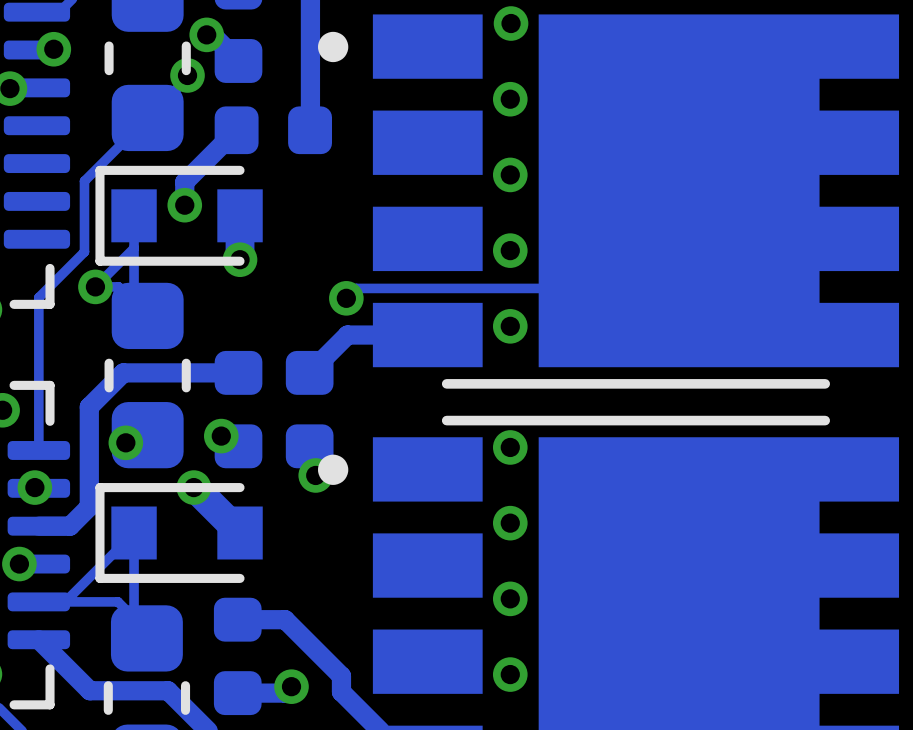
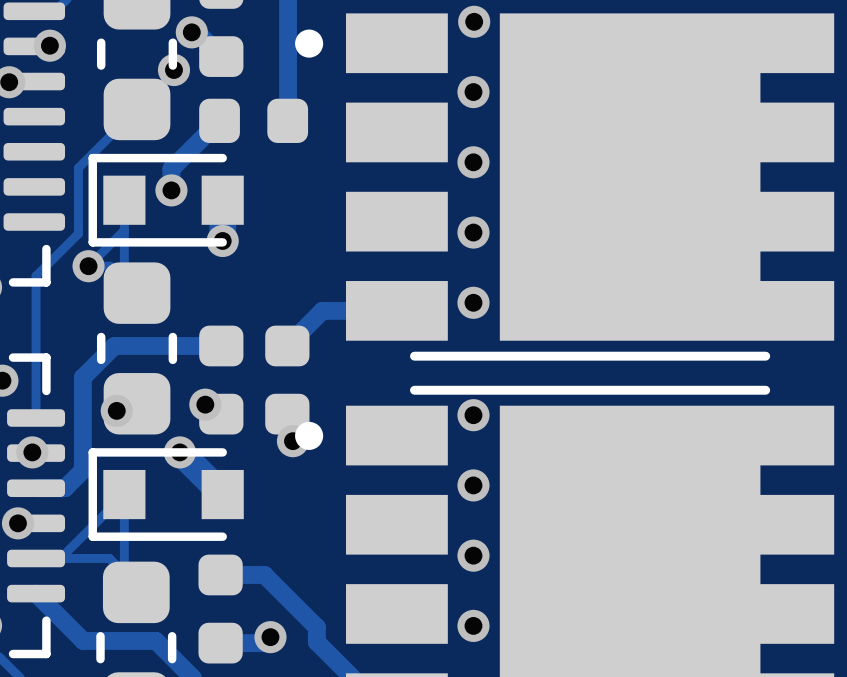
track: (679, 190) (581, 288) (356, 288) (346, 298) -> none
via: (346, 298) -> none

